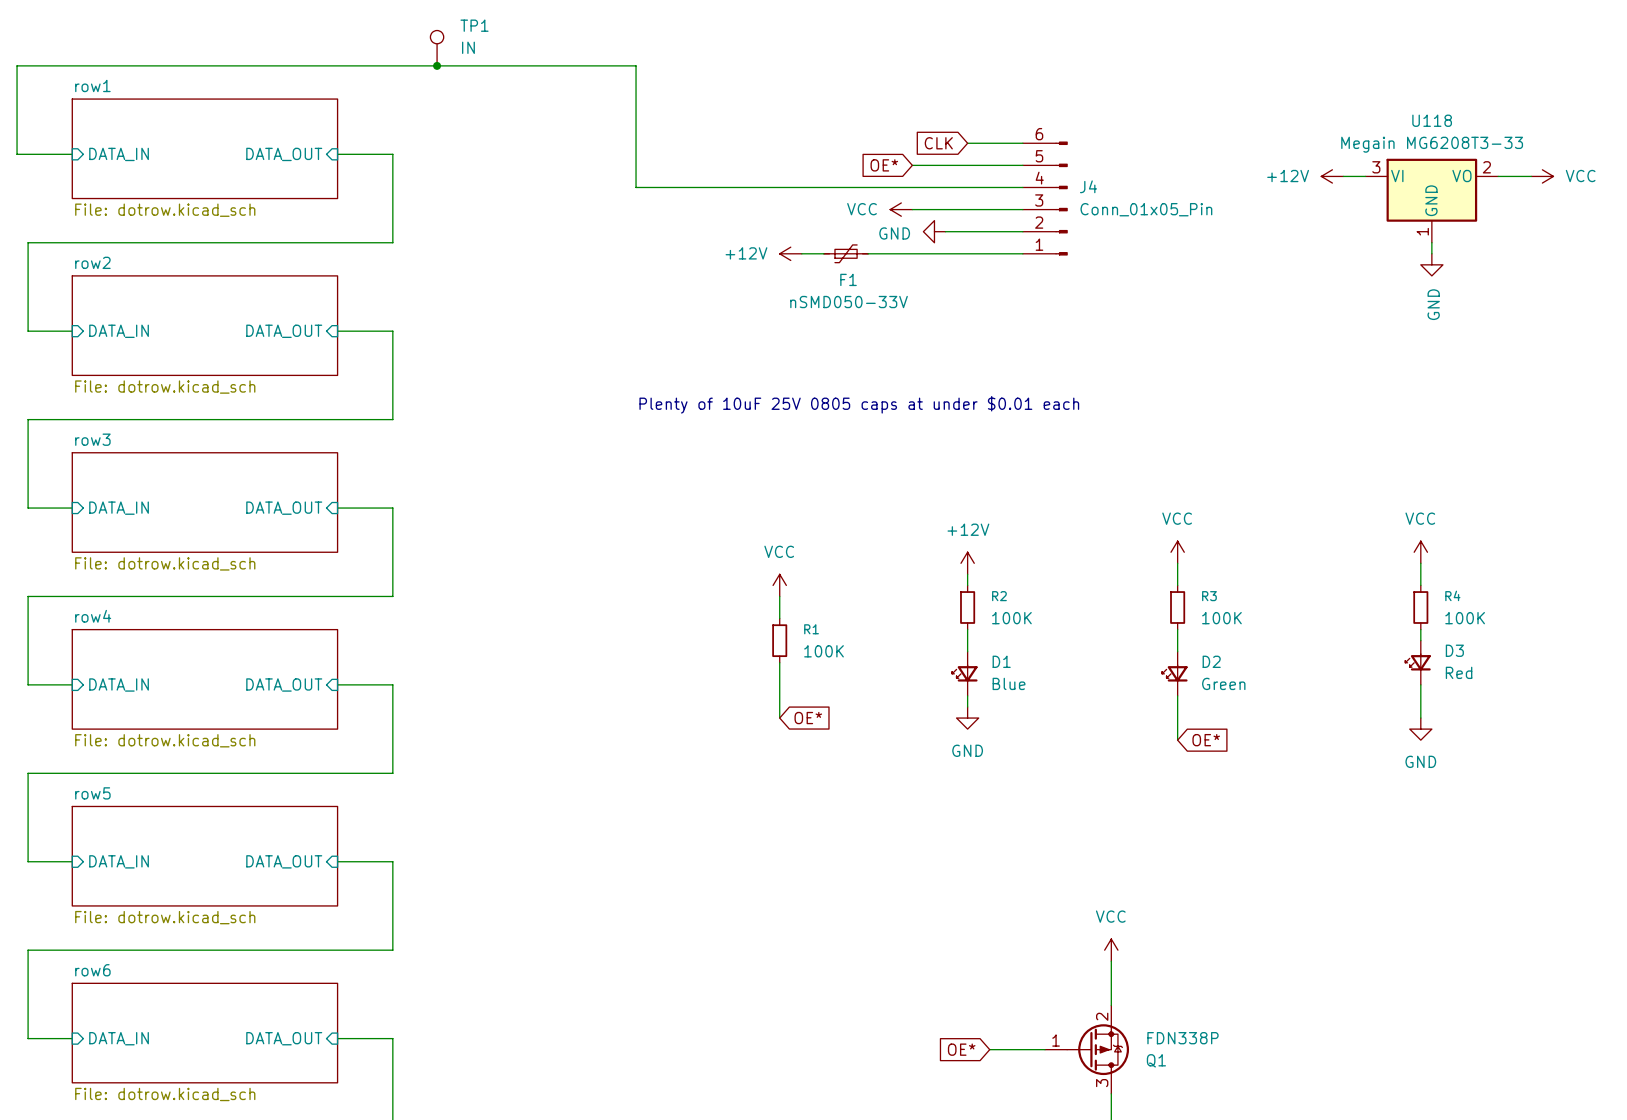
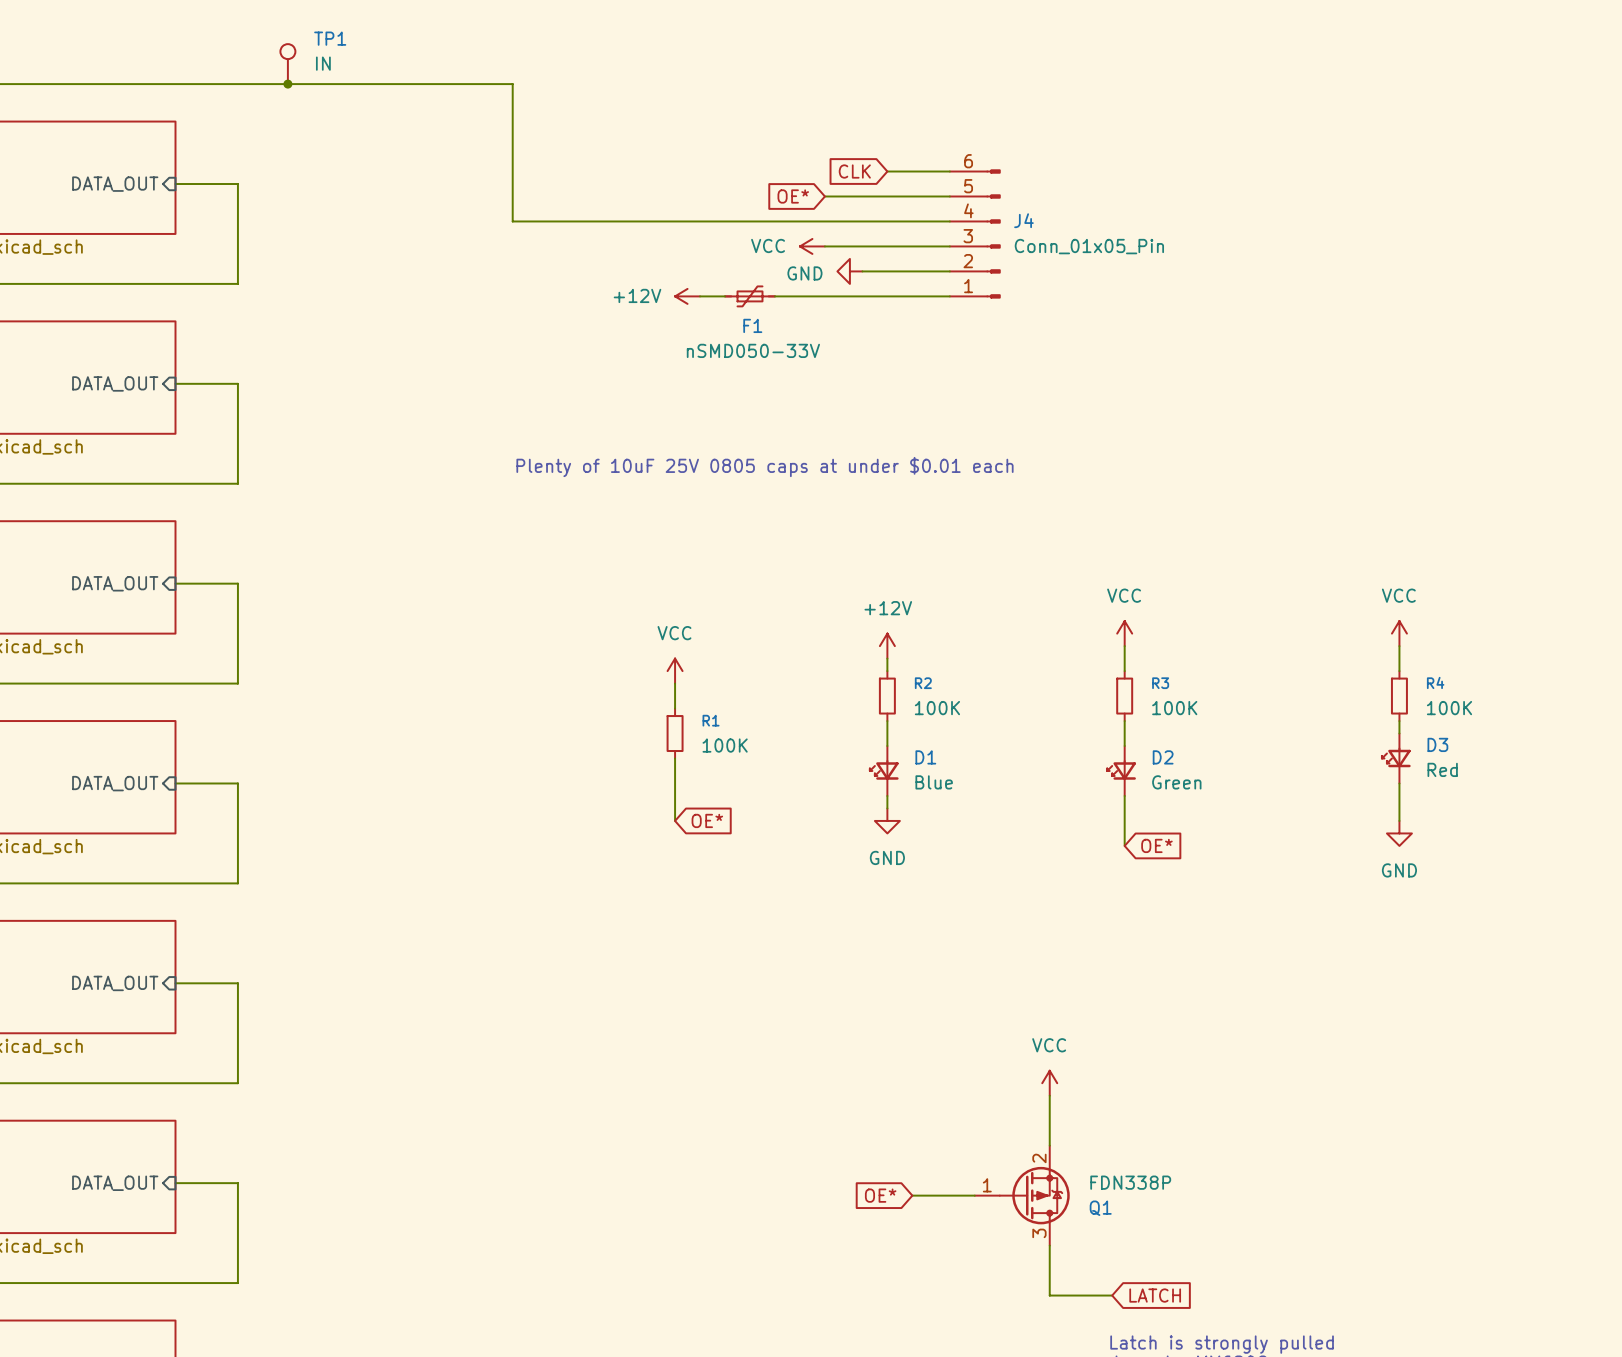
power symbol: +12V (1332, 176) -> none
wire: (1343, 176) (1365, 176) -> none
wire: (1498, 176) (1531, 176) -> none
power symbol: VCC (1542, 176) -> none
U118: Megain MG6208T3-33 (1431, 200) -> none
wire: (1431, 242) (1431, 253) -> none
power symbol: GND (1431, 264) -> none

